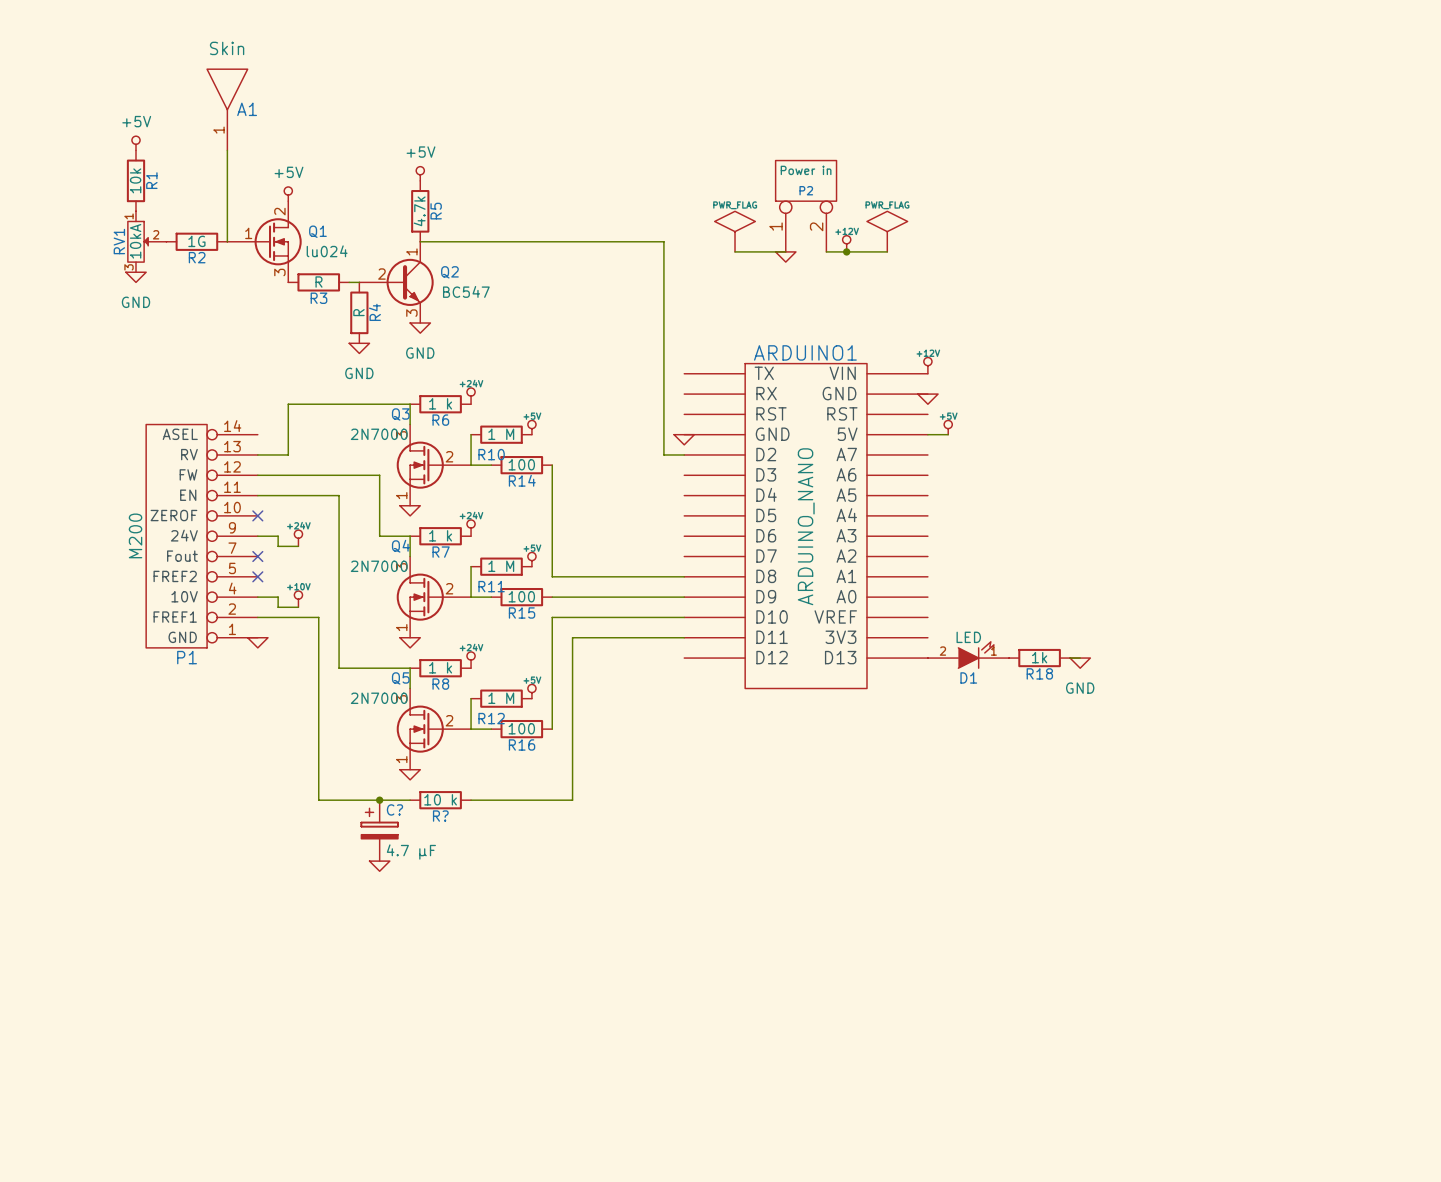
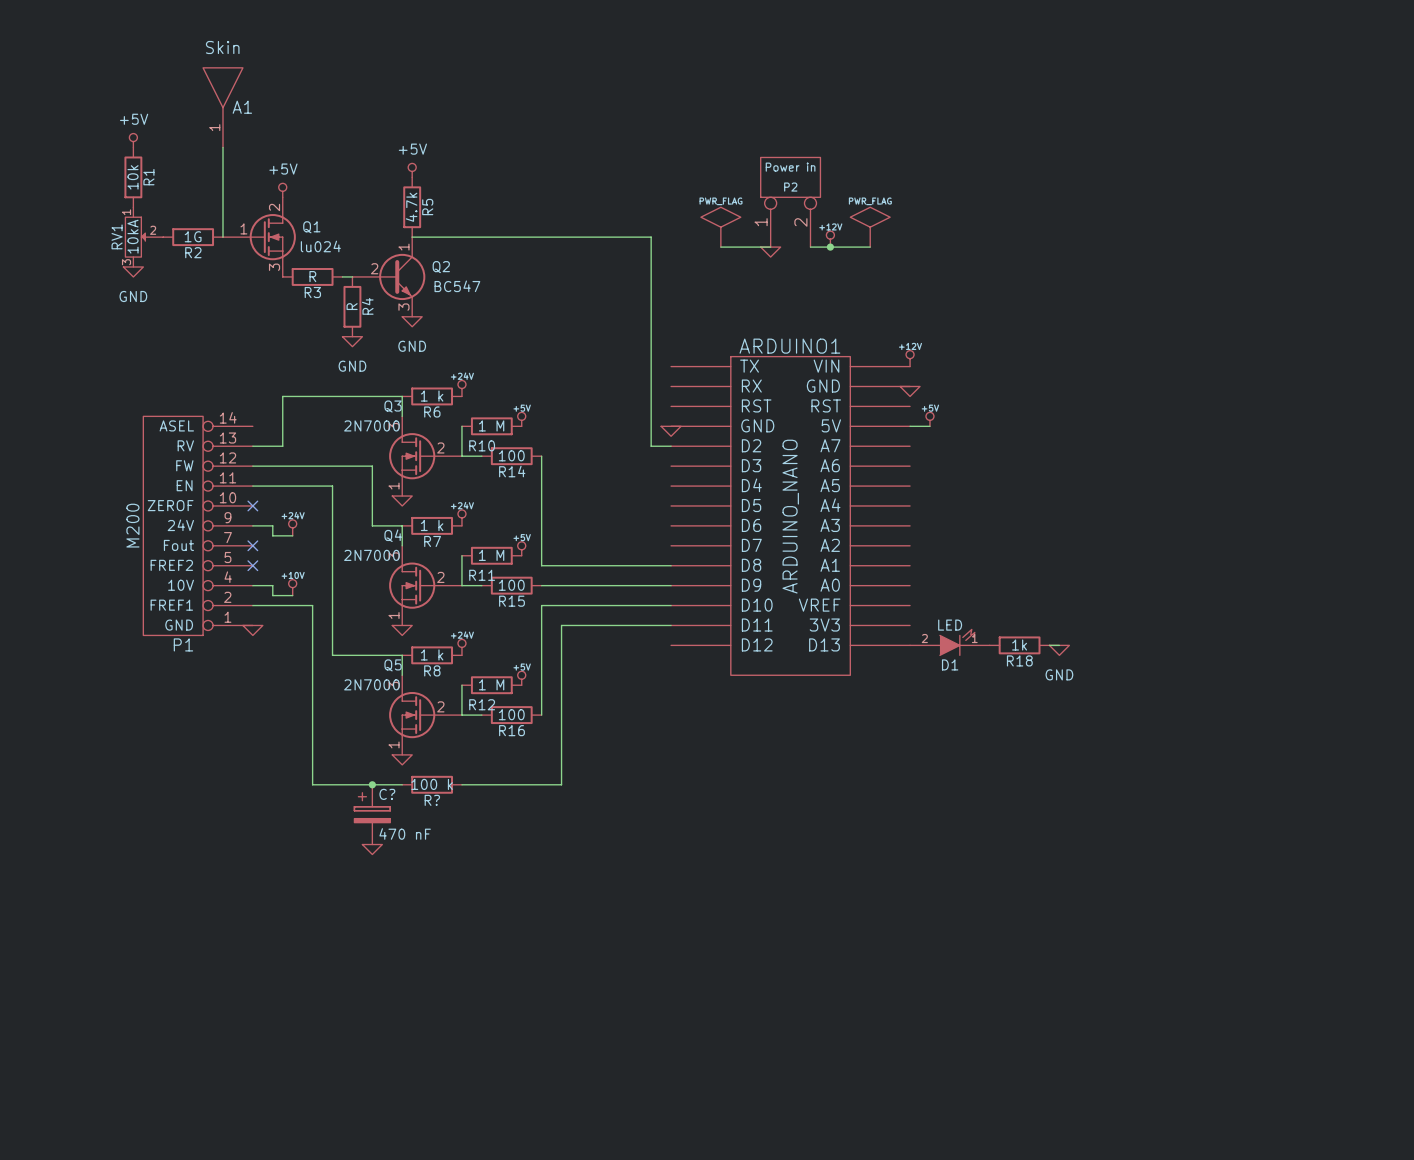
R? value: 10 k (440, 799) -> 100 k (432, 784)
C? value: 4.7 μF (411, 852) -> 470 nF (405, 833)

